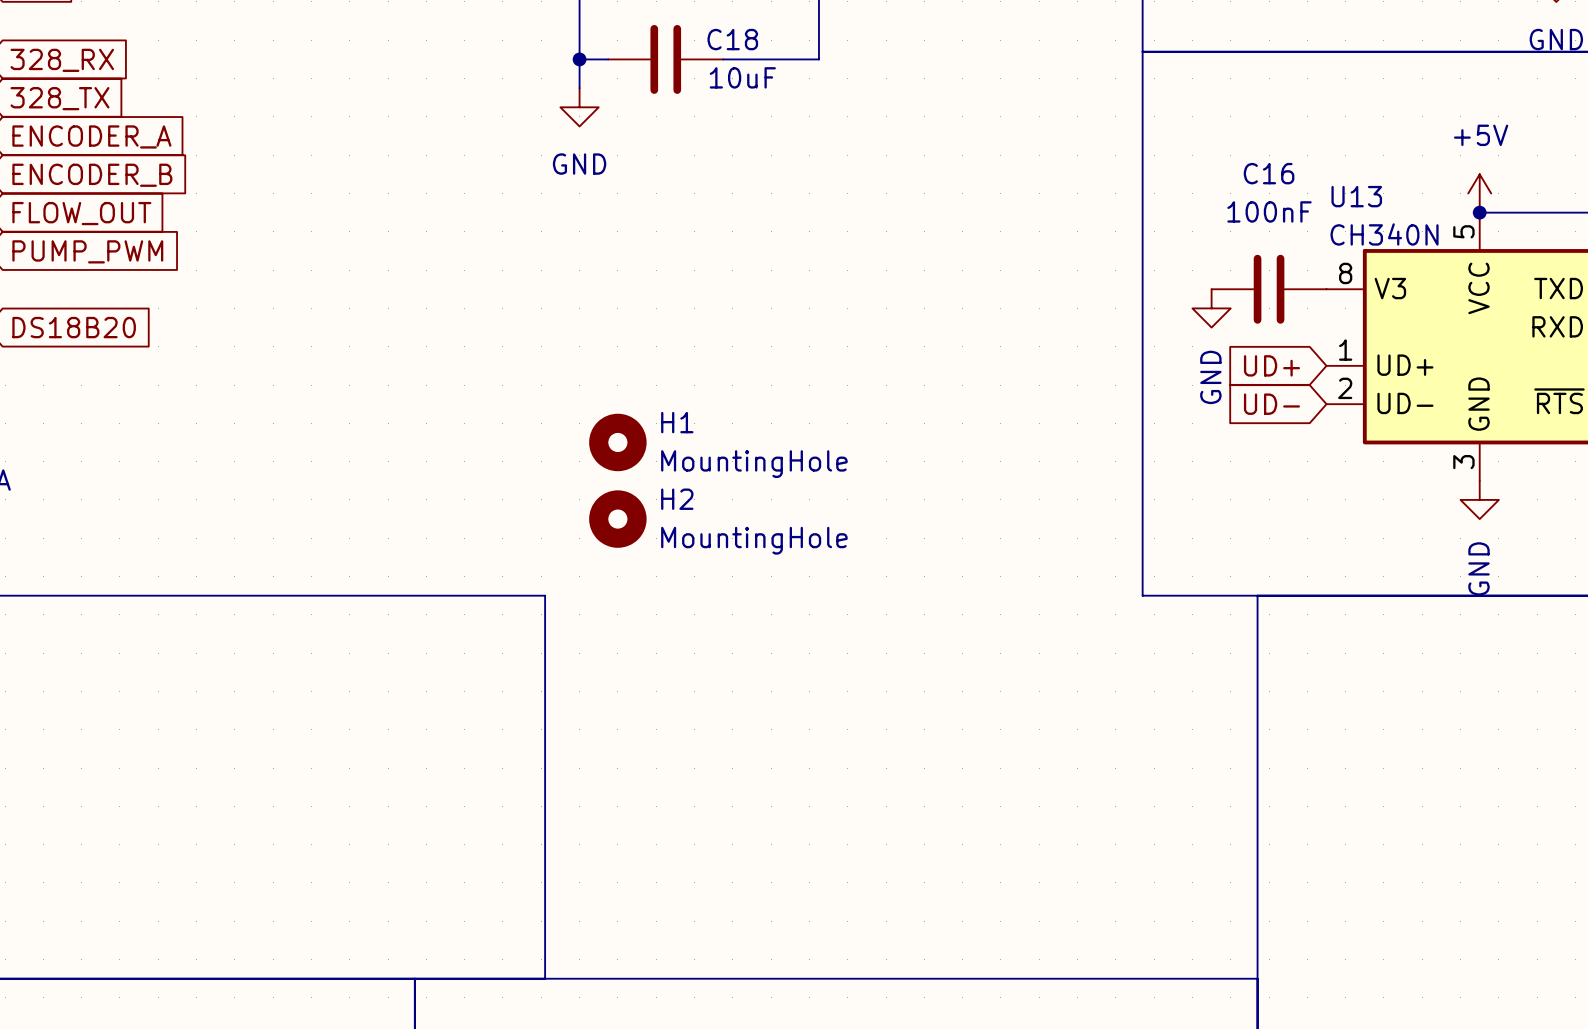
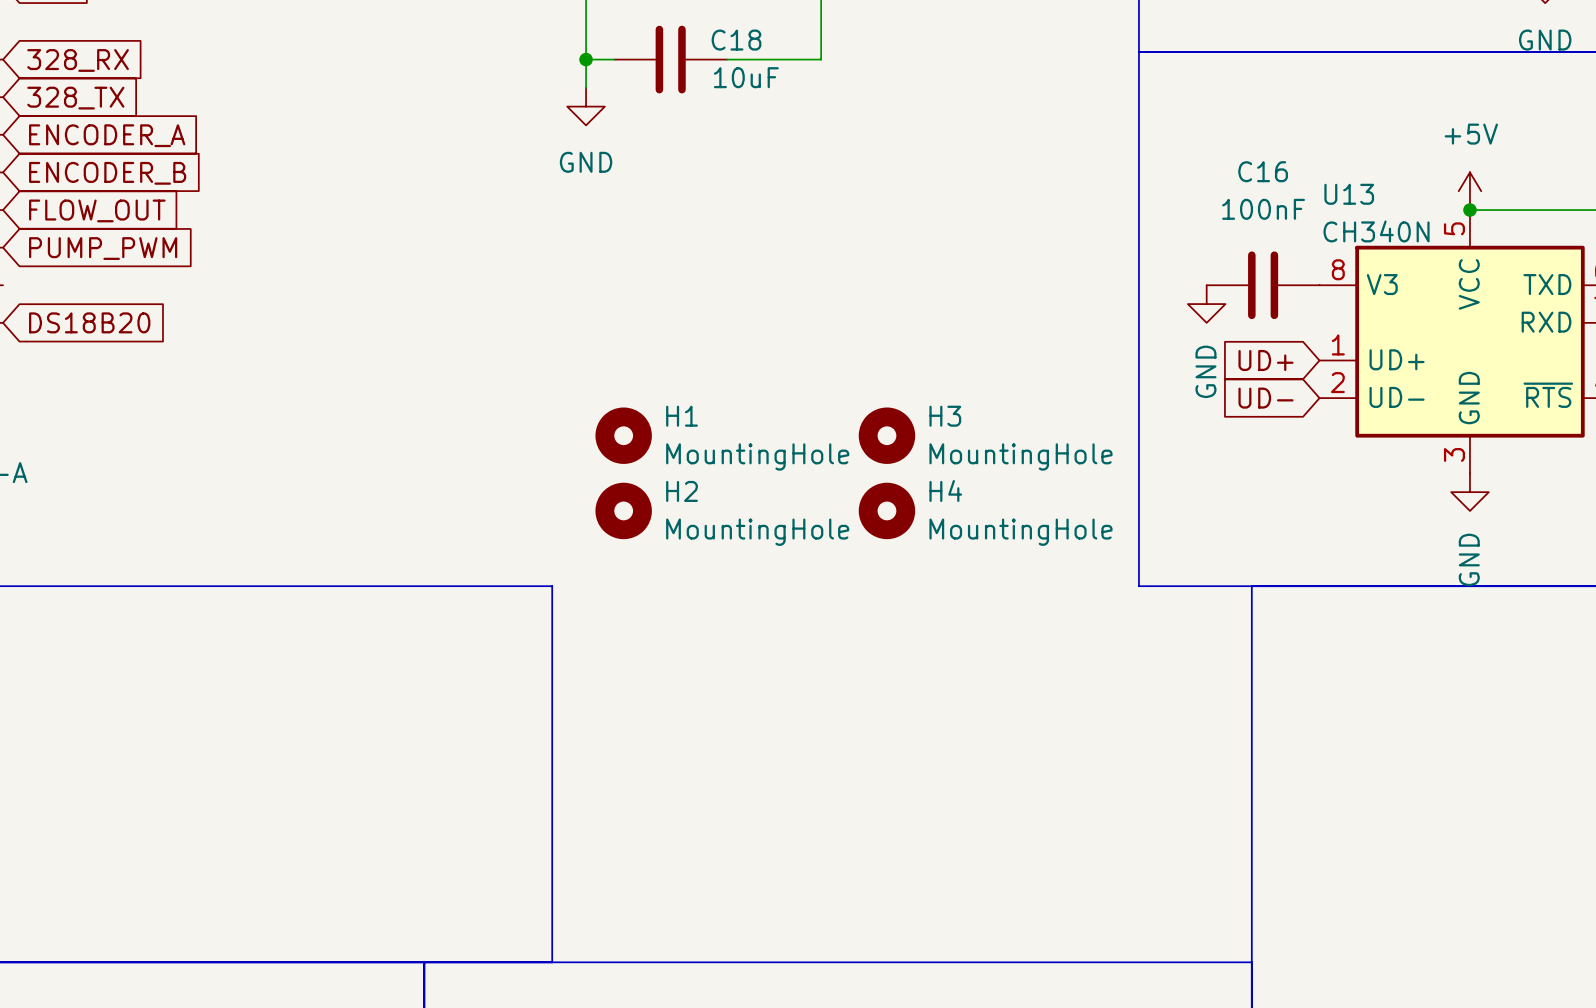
H3: none -> MountingHole (886, 435)
H4: none -> MountingHole (886, 510)

